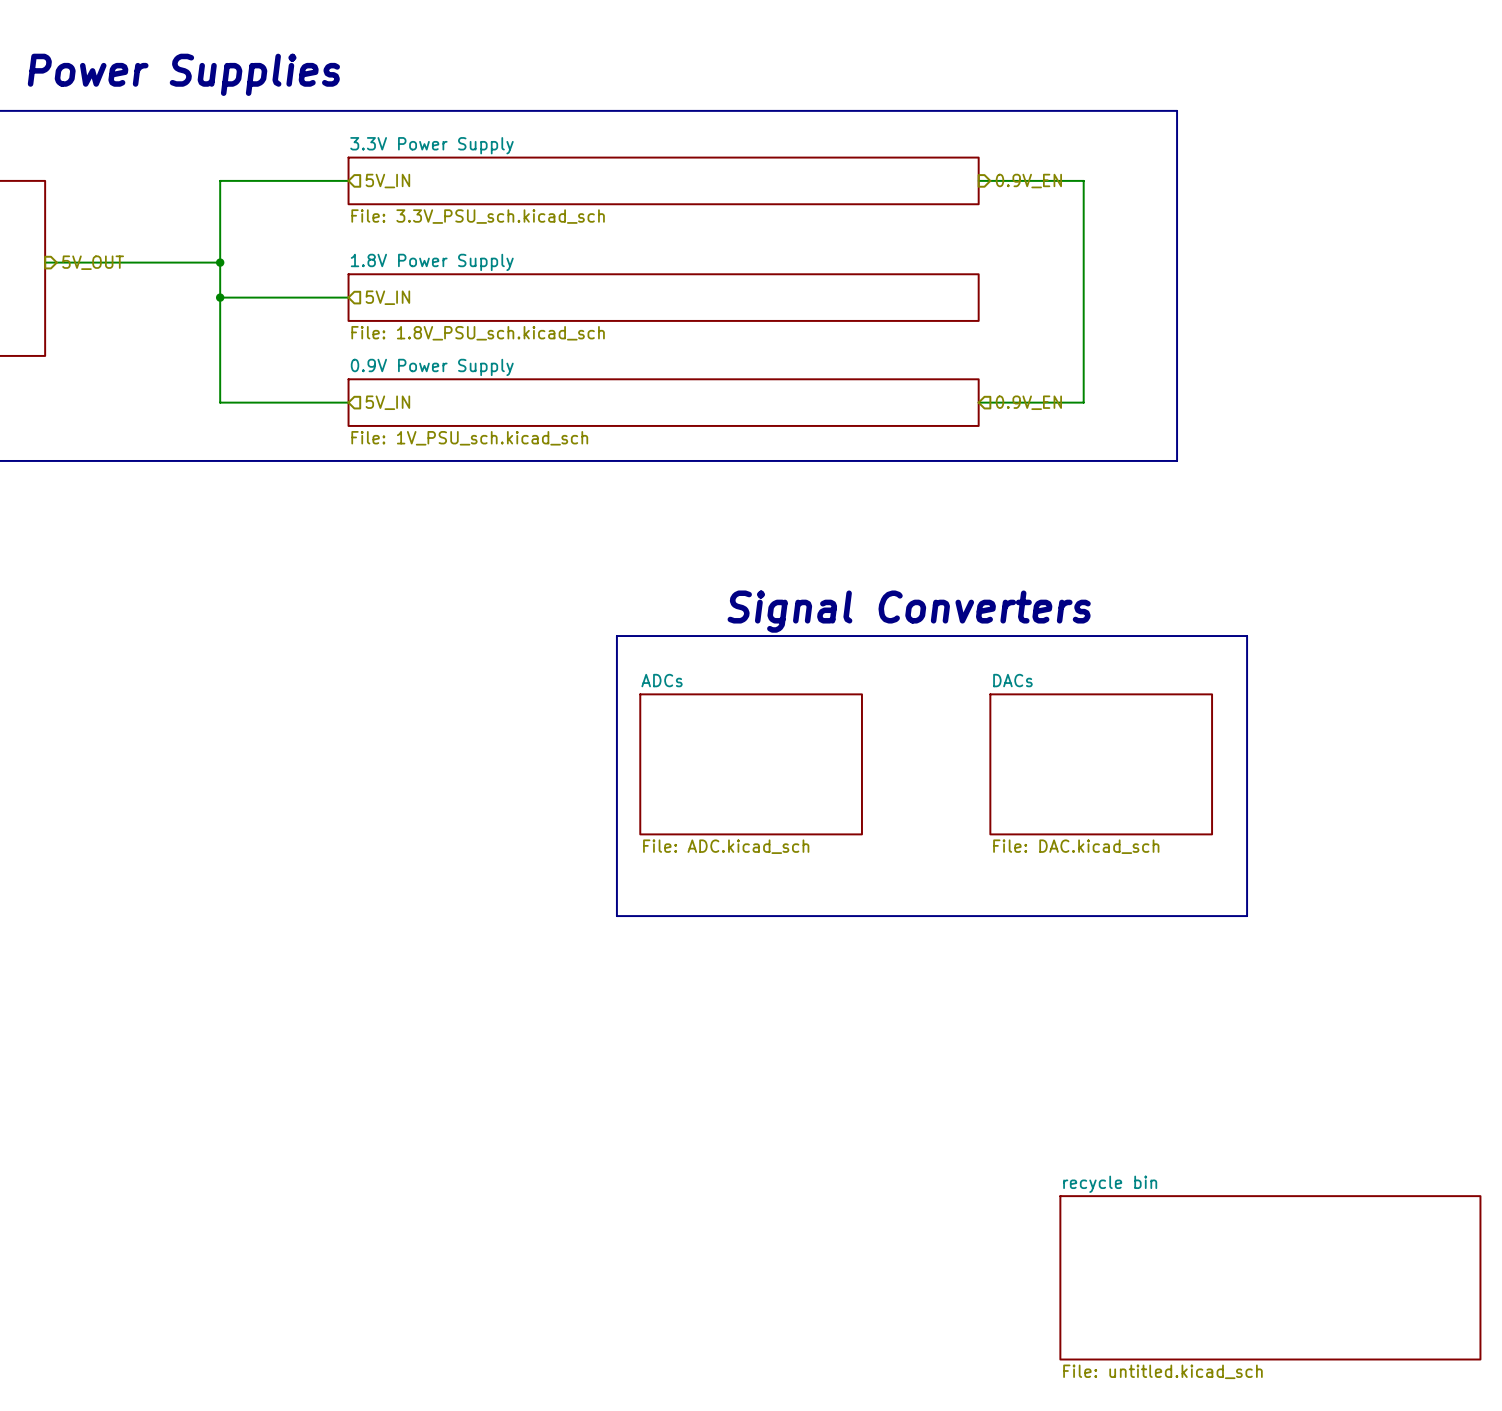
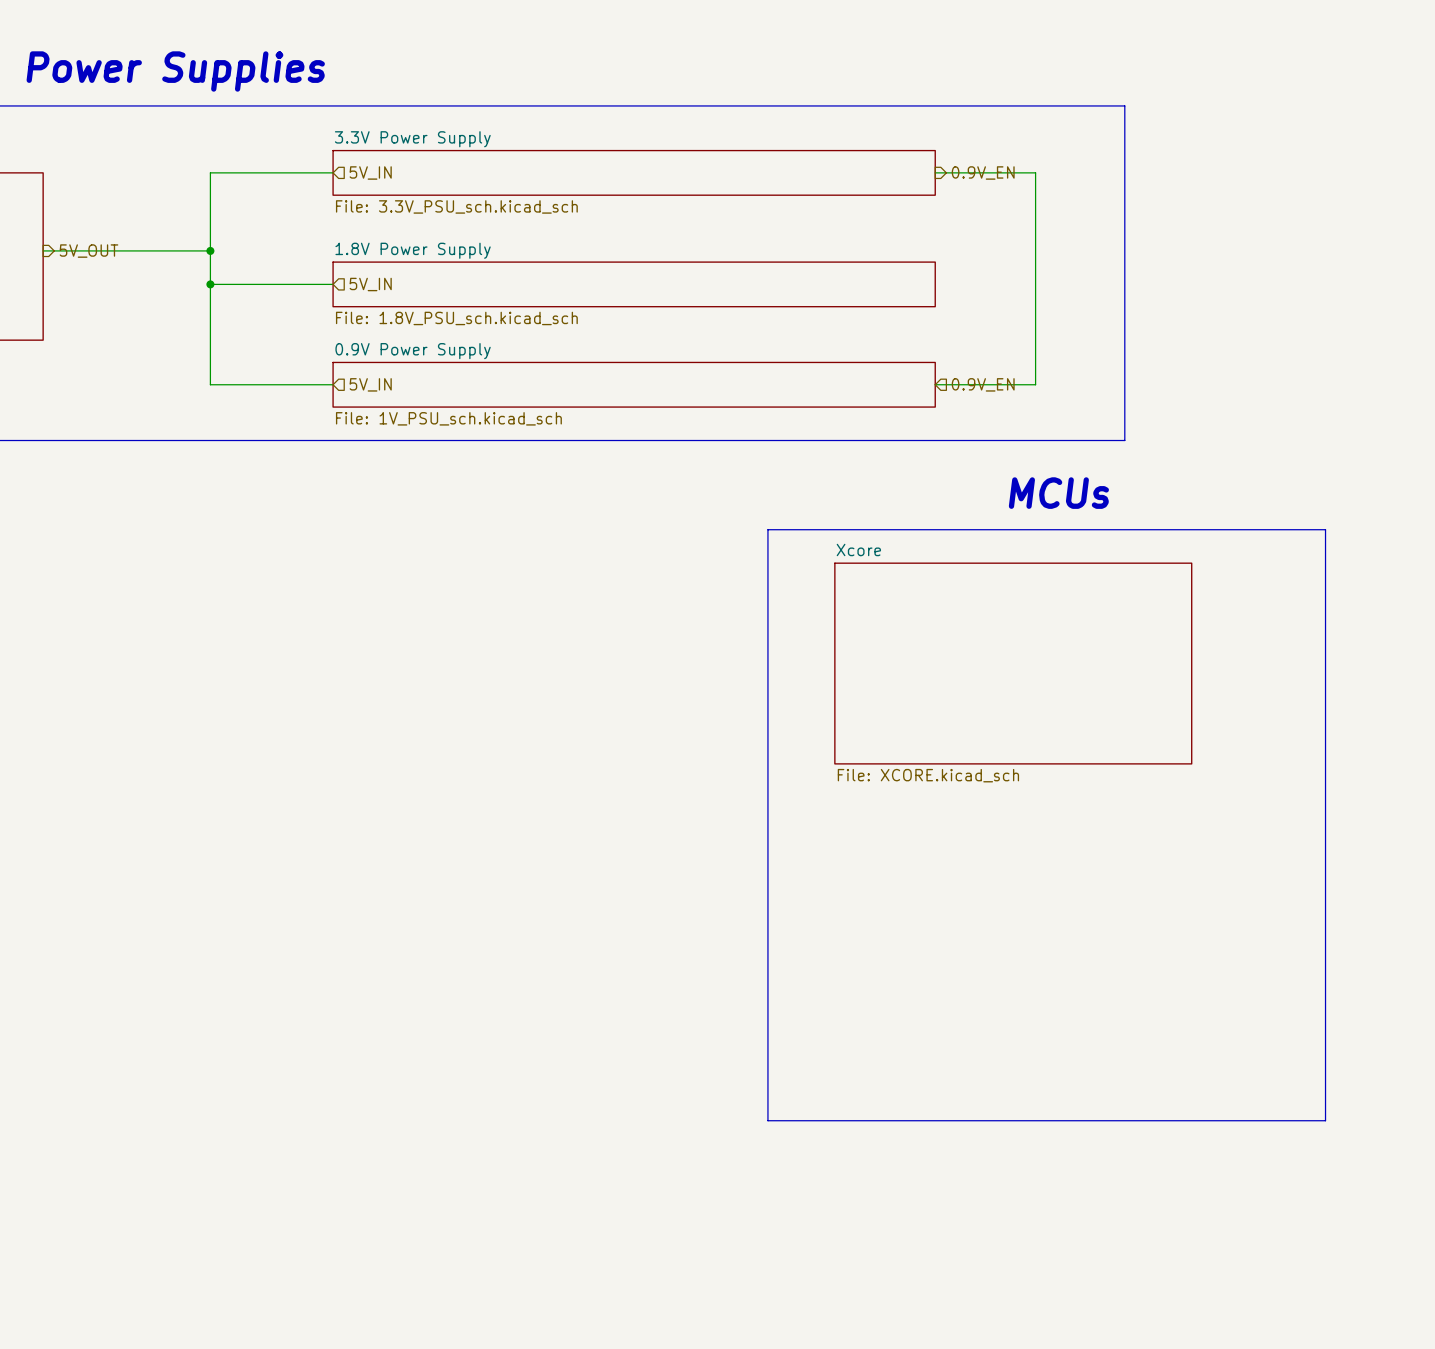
text: none -> MCUs (1058, 493)
line: none -> (767, 529) (1325, 529) (1325, 1120) (767, 1120) (767, 529)
text: Signal Converters (909, 611) -> none
line: (616, 636) (1247, 636) (1247, 916) (616, 916) (616, 636) -> none
sheet Xcore: none -> File: XCORE.kicad_sch (1013, 663)
sheet ADCs: File: ADC.kicad_sch (751, 764) -> none
sheet DACs: File: DAC.kicad_sch (1101, 764) -> none
sheet recycle bin: File: untitled.kicad_sch (1270, 1277) -> none

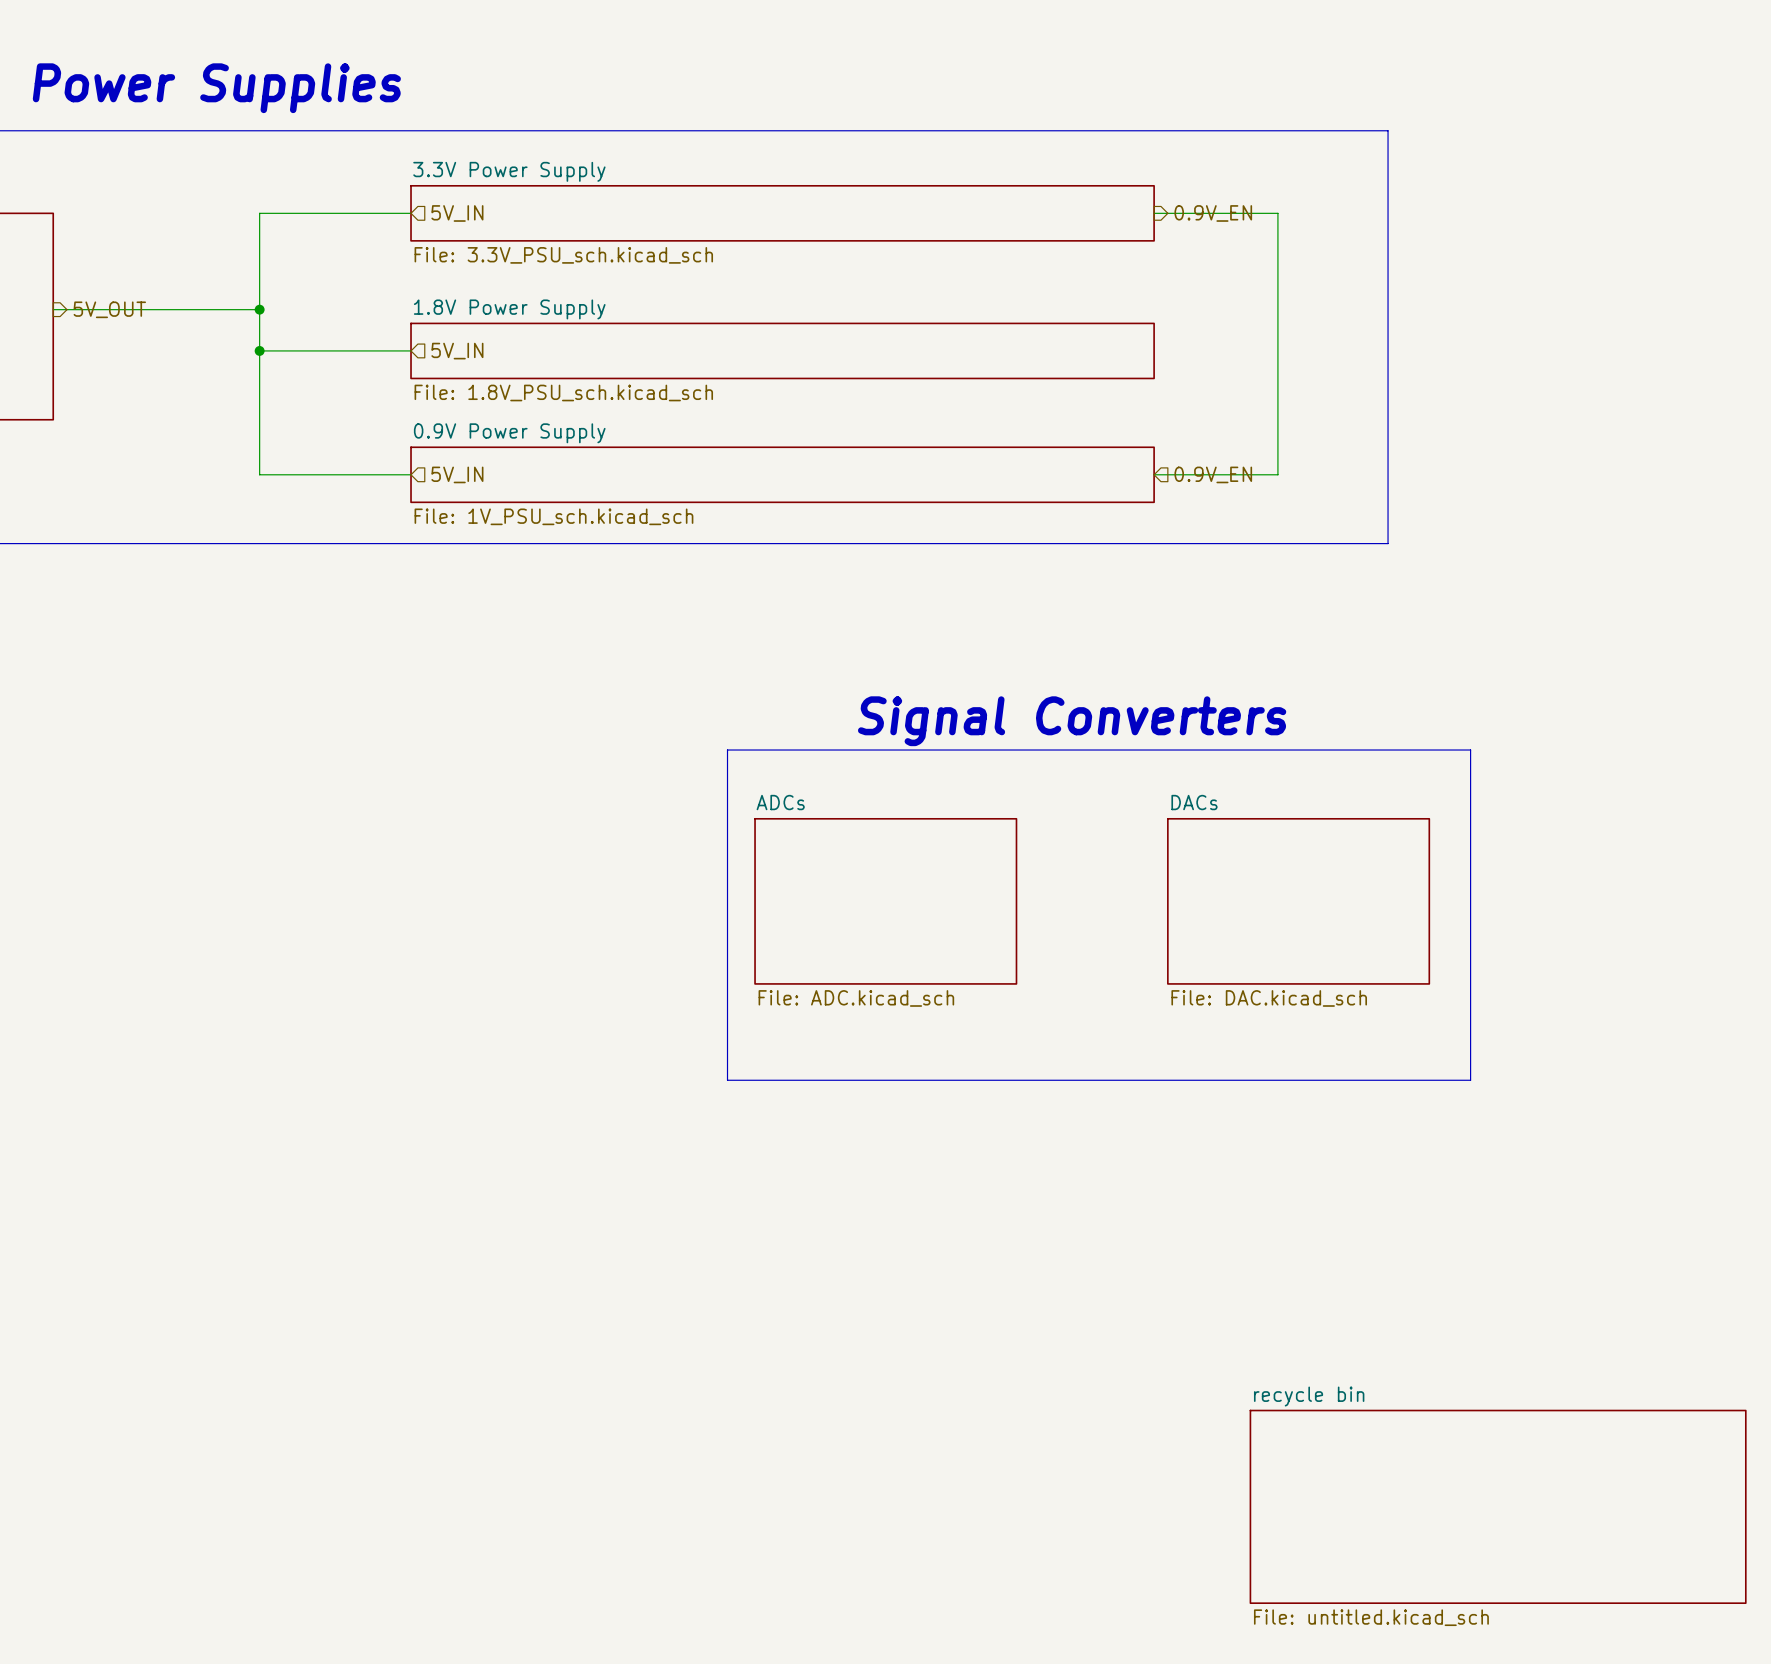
text: MCUs (1058, 493) -> none
line: (767, 529) (1325, 529) (1325, 1120) (767, 1120) (767, 529) -> none
text: none -> Signal Converters (1072, 721)
line: none -> (727, 750) (1470, 750) (1470, 1080) (727, 1080) (727, 750)
sheet Xcore: File: XCORE.kicad_sch (1013, 663) -> none
sheet ADCs: none -> File: ADC.kicad_sch (885, 901)
sheet DACs: none -> File: DAC.kicad_sch (1298, 901)
sheet recycle bin: none -> File: untitled.kicad_sch (1498, 1506)

